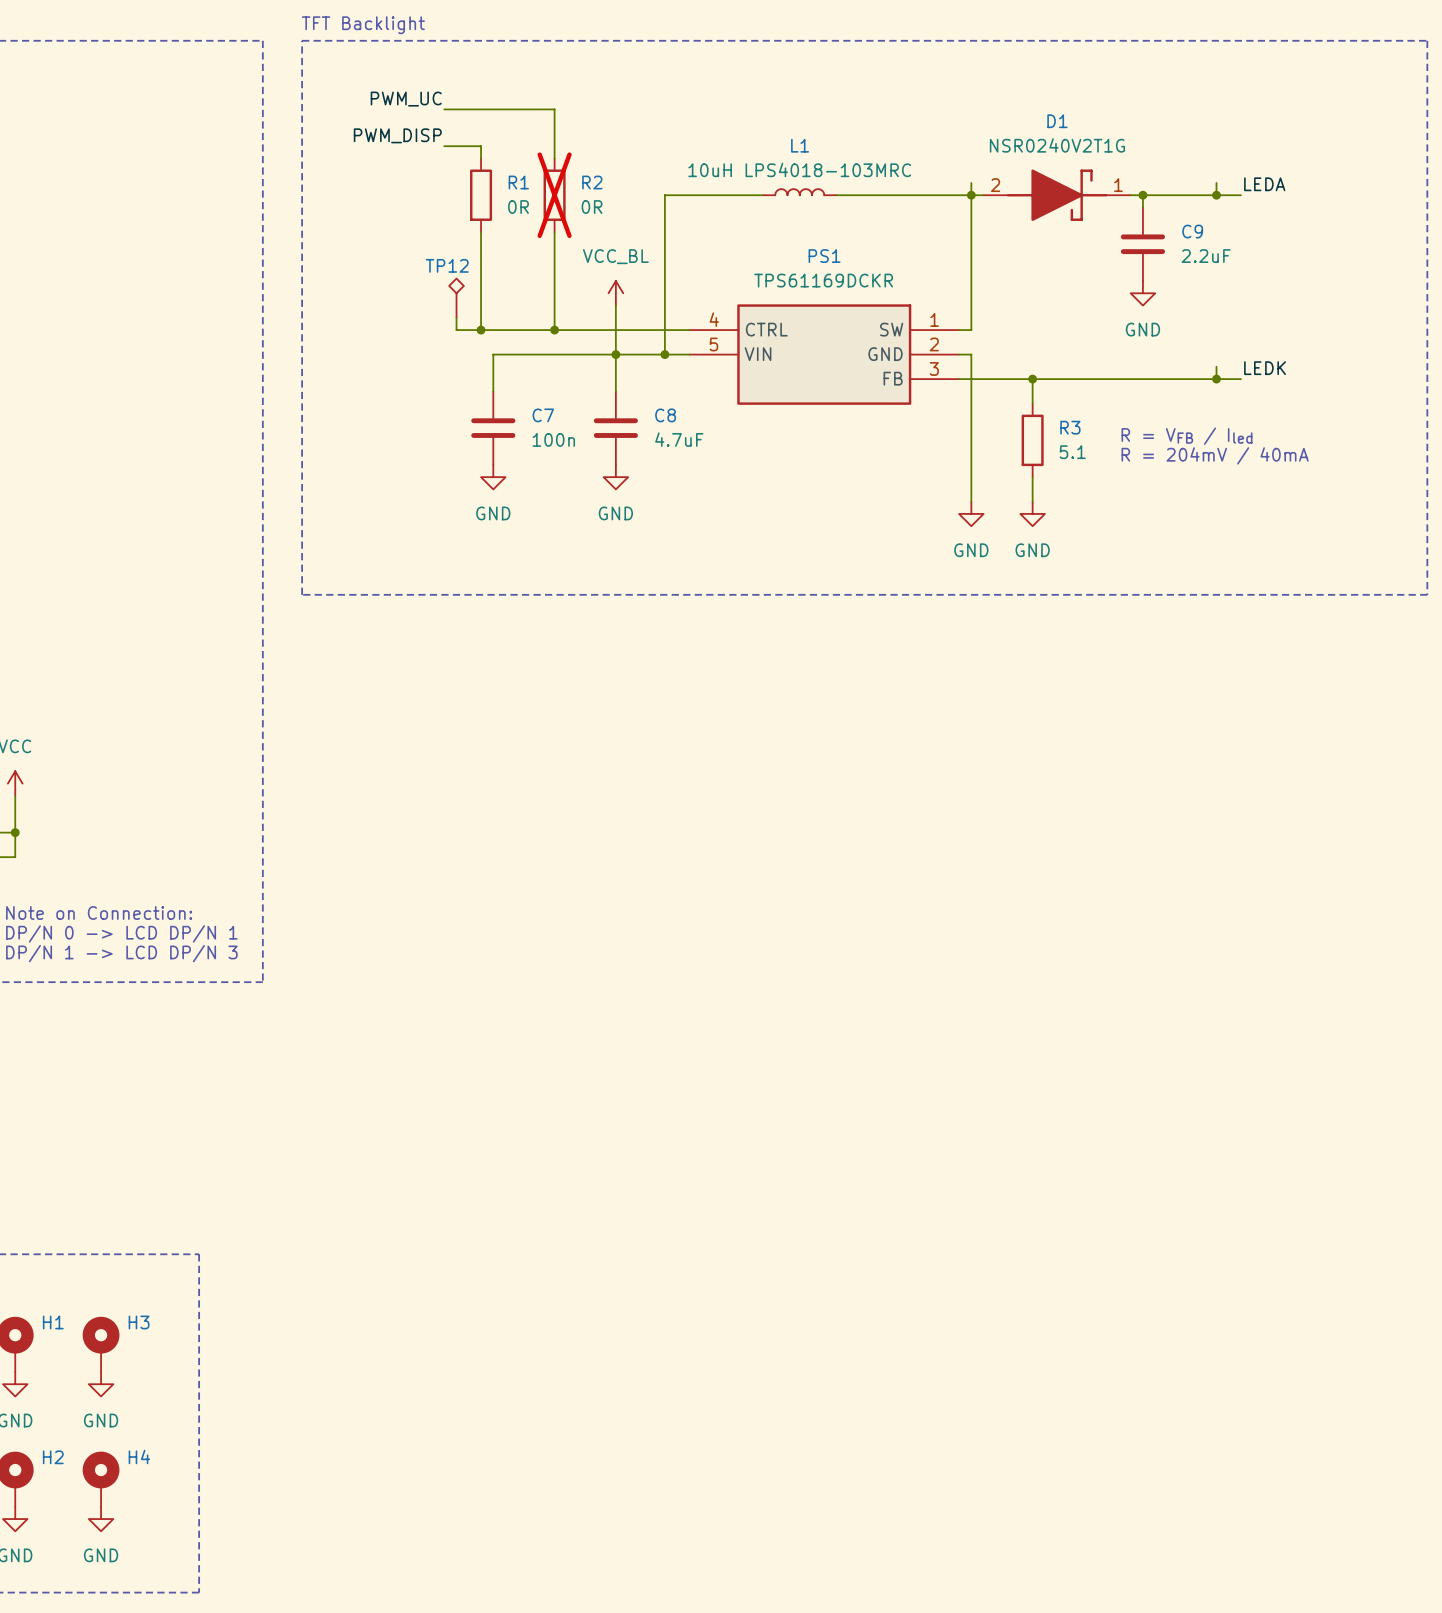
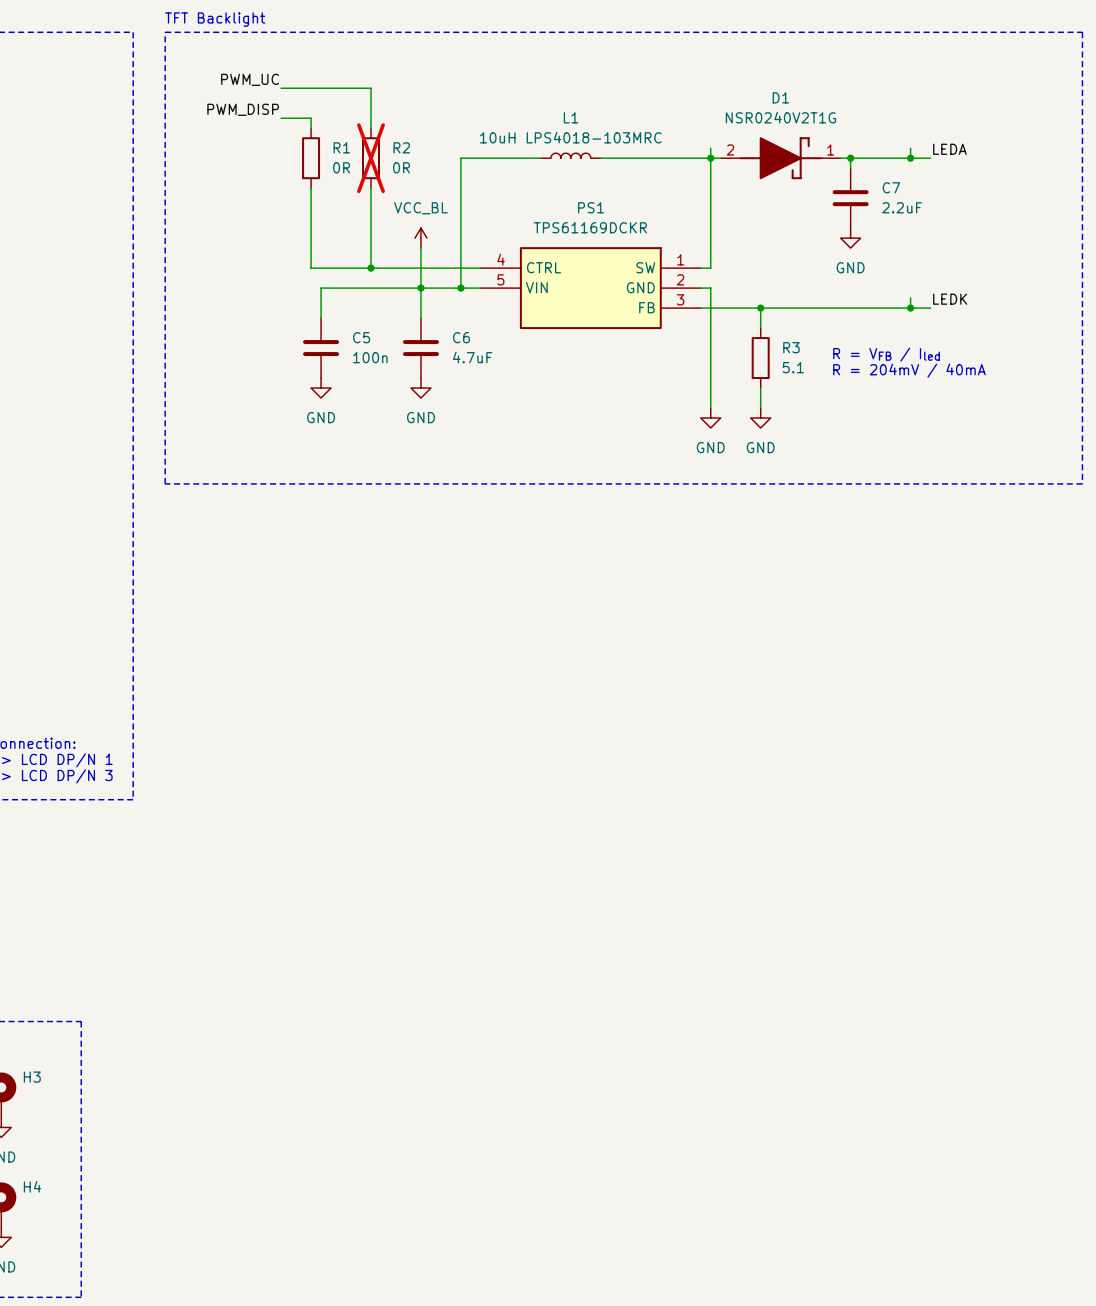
C9 name: C9 (1192, 231) -> C7 (891, 187)
TP12: (456, 298) -> none
wire: (456, 317) (456, 330) (481, 330) -> none
junction: (481, 330) -> none
C7 name: C7 (543, 415) -> C5 (361, 337)
C8 name: C8 (665, 415) -> C6 (461, 337)

